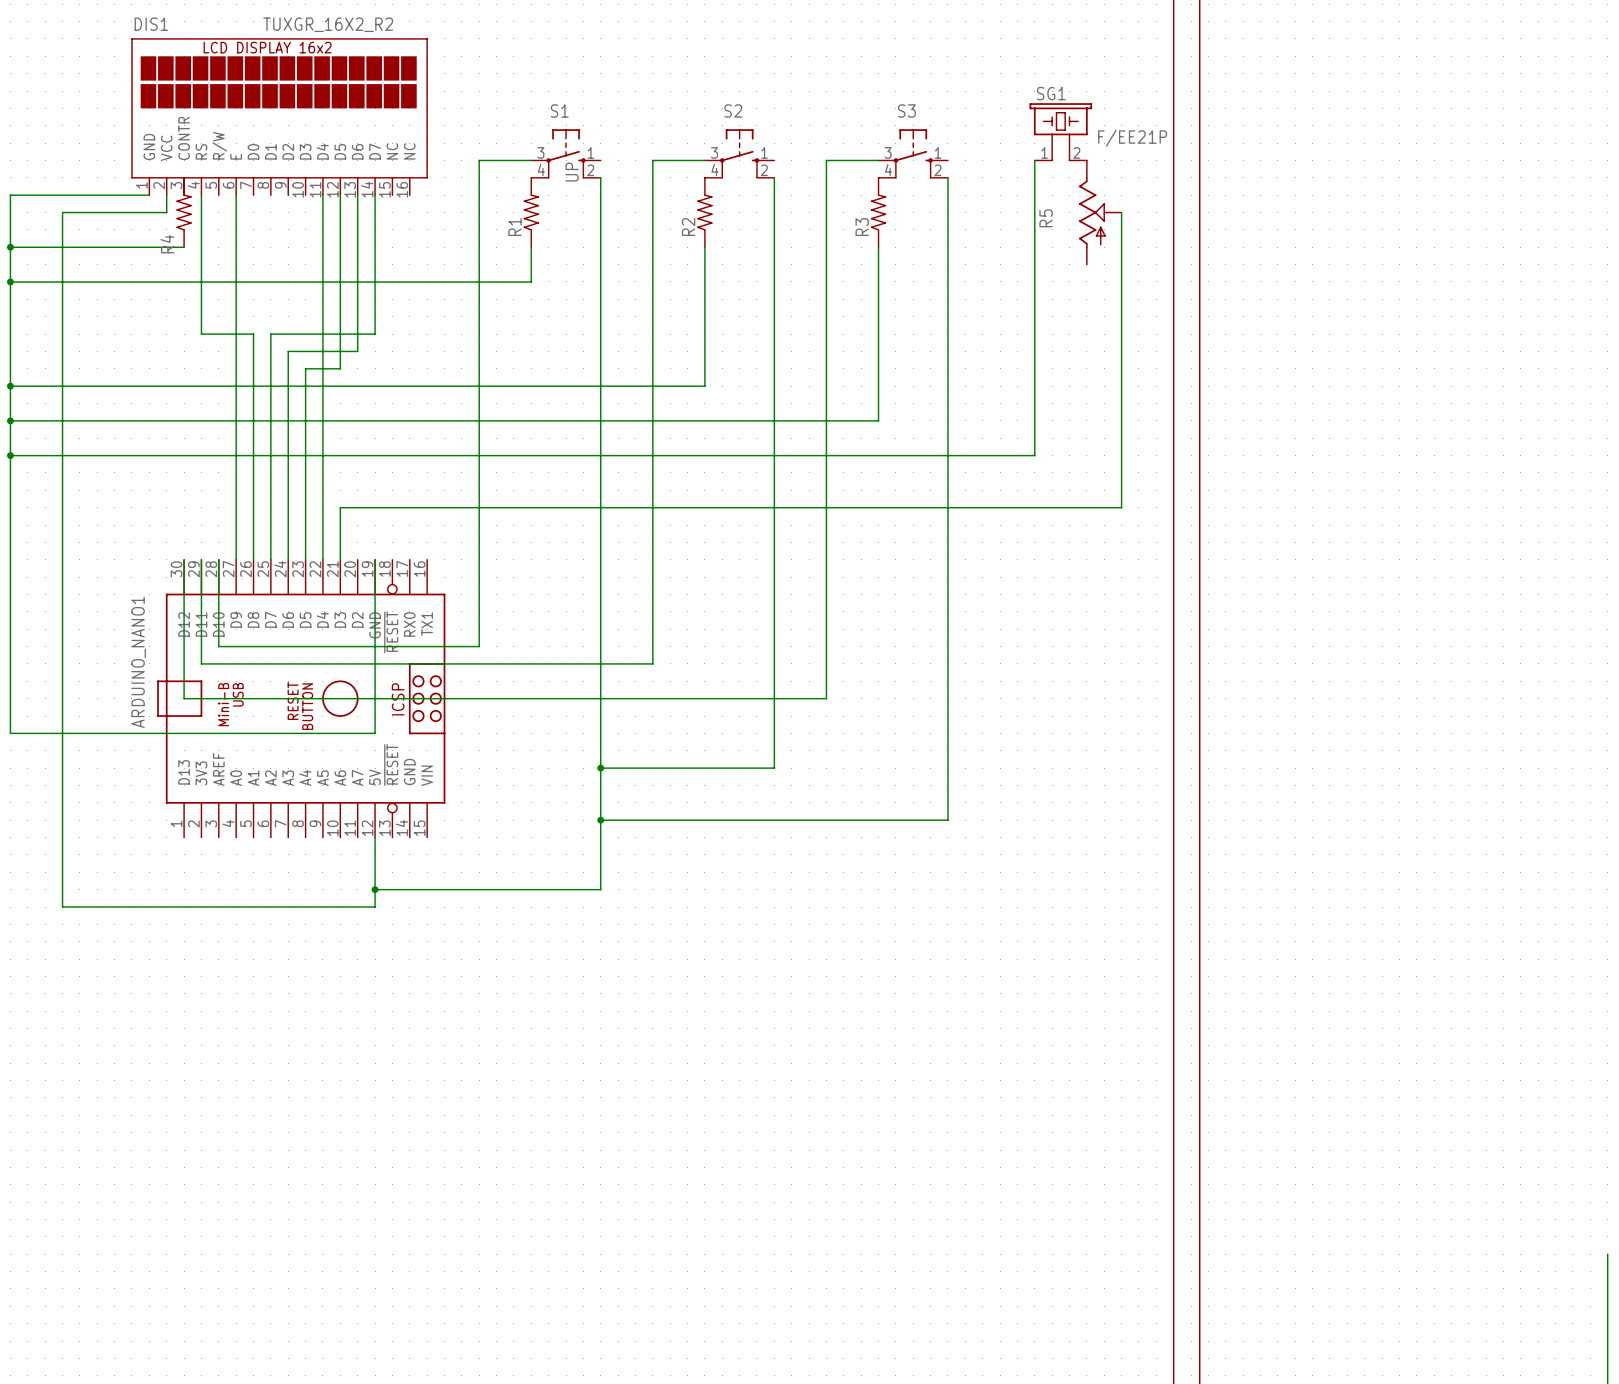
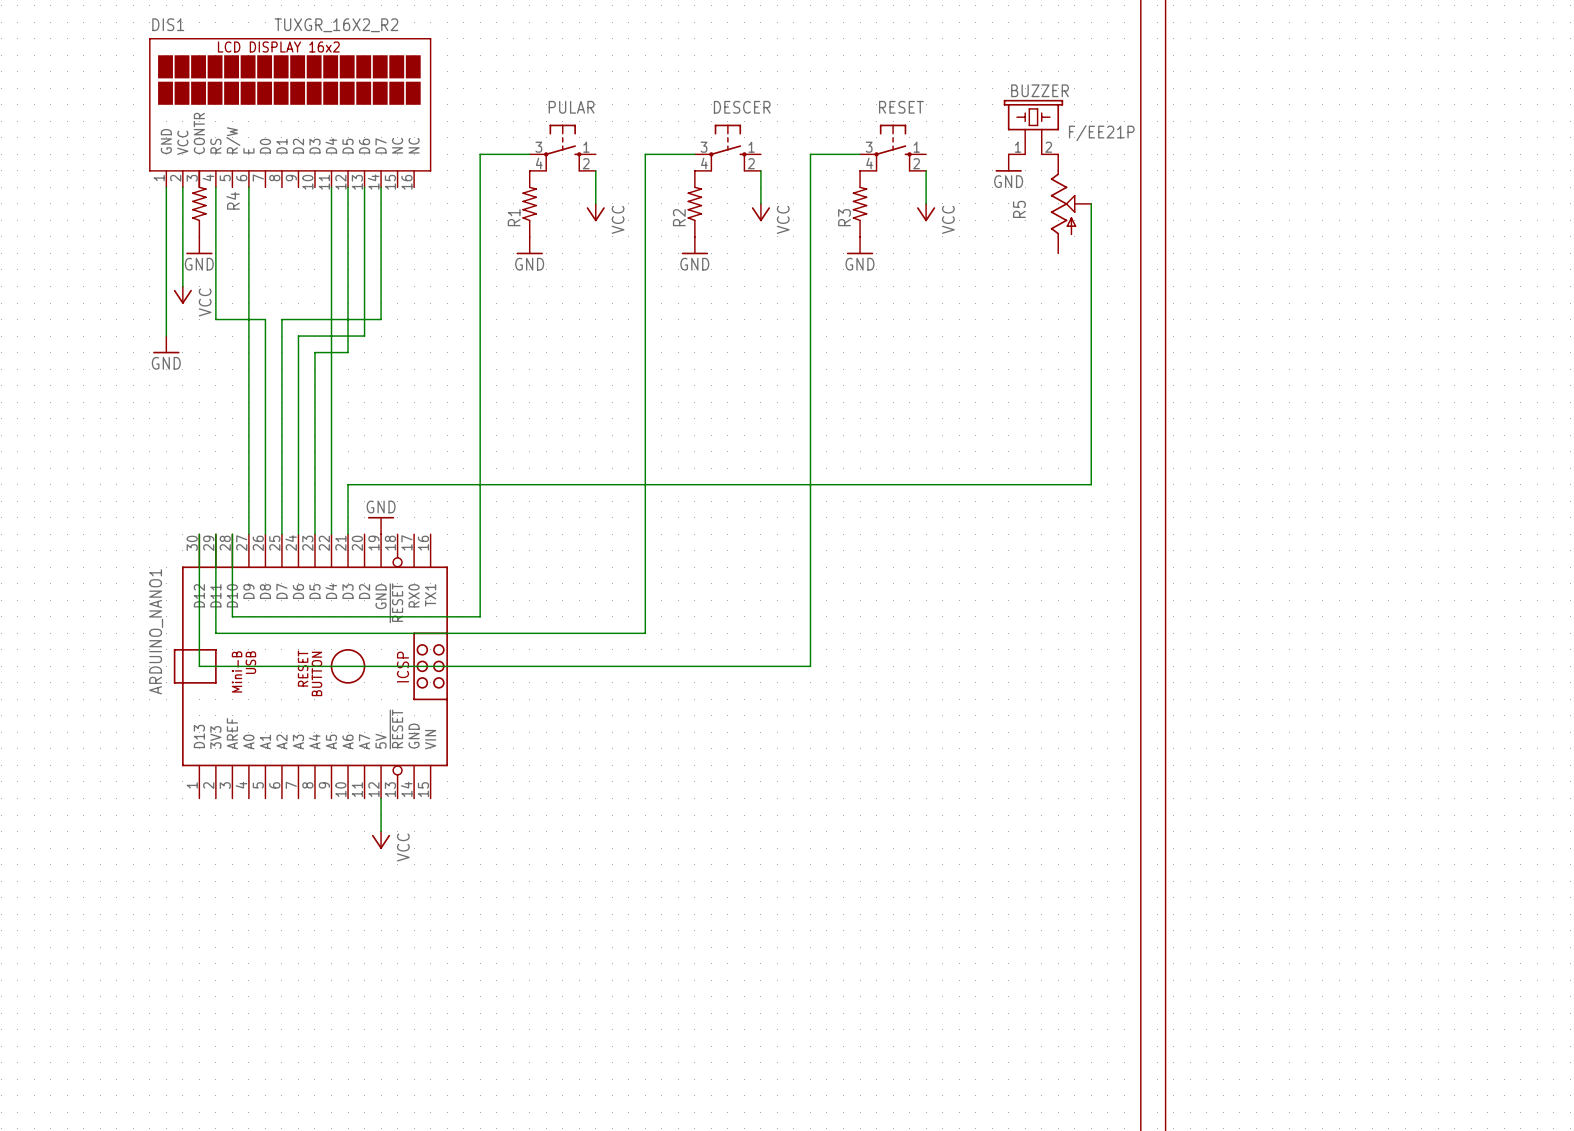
SG1 name: SG1 (1051, 93) -> BUZZER (1040, 90)
S1 name: S1 (559, 110) -> PULAR (571, 107)
S2 name: S2 (733, 110) -> DESCER (742, 107)
S3 name: S3 (906, 110) -> RESET (901, 107)
wire: (1034, 160) (1034, 455) (10, 455) -> none
power symbol: none -> GND (1008, 163)
S1 text: UP (572, 172) -> none
wire: (149, 195) (10, 195) (10, 733) (375, 733) (375, 559) -> (166, 187) (166, 336)
wire: (166, 212) (62, 212) (62, 907) (375, 907) (375, 872) -> (182, 203) (182, 286)
wire: (600, 212) (600, 889) (375, 889) -> none
wire: (774, 212) (774, 768) (600, 768) -> none
wire: (947, 212) (947, 820) (600, 820) -> none
power symbol: none -> VCC (595, 212)
power symbol: none -> VCC (760, 212)
power symbol: none -> VCC (926, 212)
R4 name position: R4 (167, 244) -> R4 (233, 200)
wire: (10, 247) (184, 247) -> none
junction: (10, 247) -> none
wire: (531, 247) (531, 281) (10, 281) -> none
wire: (704, 247) (704, 386) (10, 386) -> none
wire: (878, 247) (878, 420) (10, 420) -> none
power symbol: none -> GND (199, 245)
power symbol: none -> GND (529, 245)
power symbol: none -> GND (694, 245)
power symbol: none -> GND (860, 245)
junction: (10, 281) -> none
power symbol: none -> VCC (182, 295)
power symbol: none -> GND (166, 344)
junction: (10, 386) -> none
junction: (10, 420) -> none
junction: (10, 455) -> none
power symbol: none -> GND (381, 525)
junction: (600, 768) -> none
junction: (600, 820) -> none
power symbol: none -> VCC (381, 840)
junction: (375, 889) -> none

